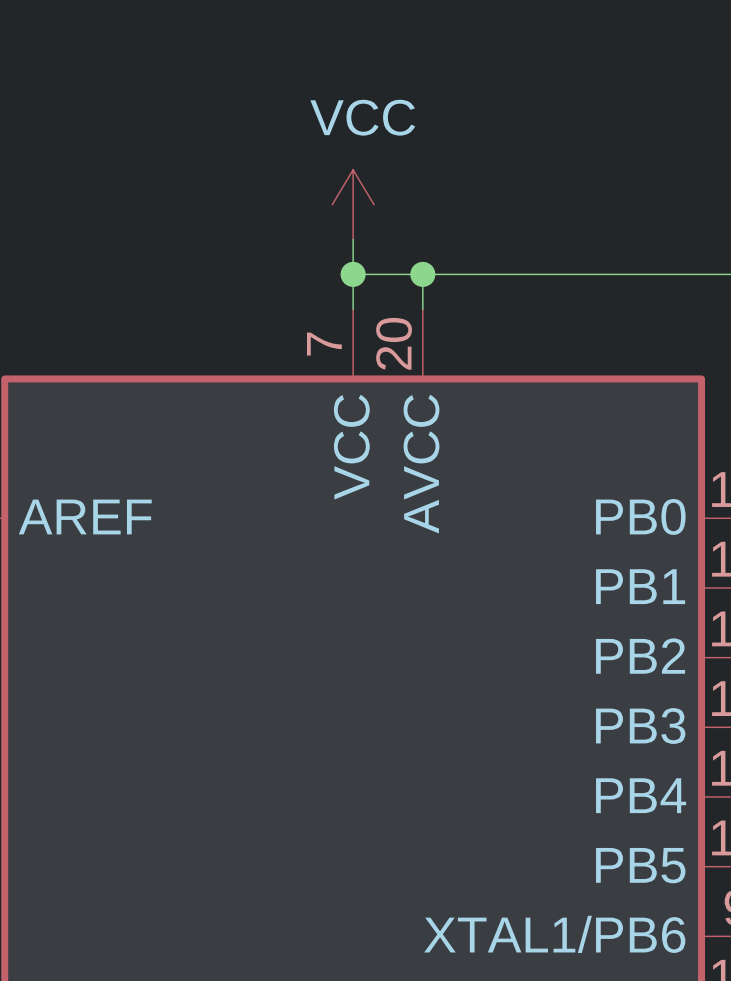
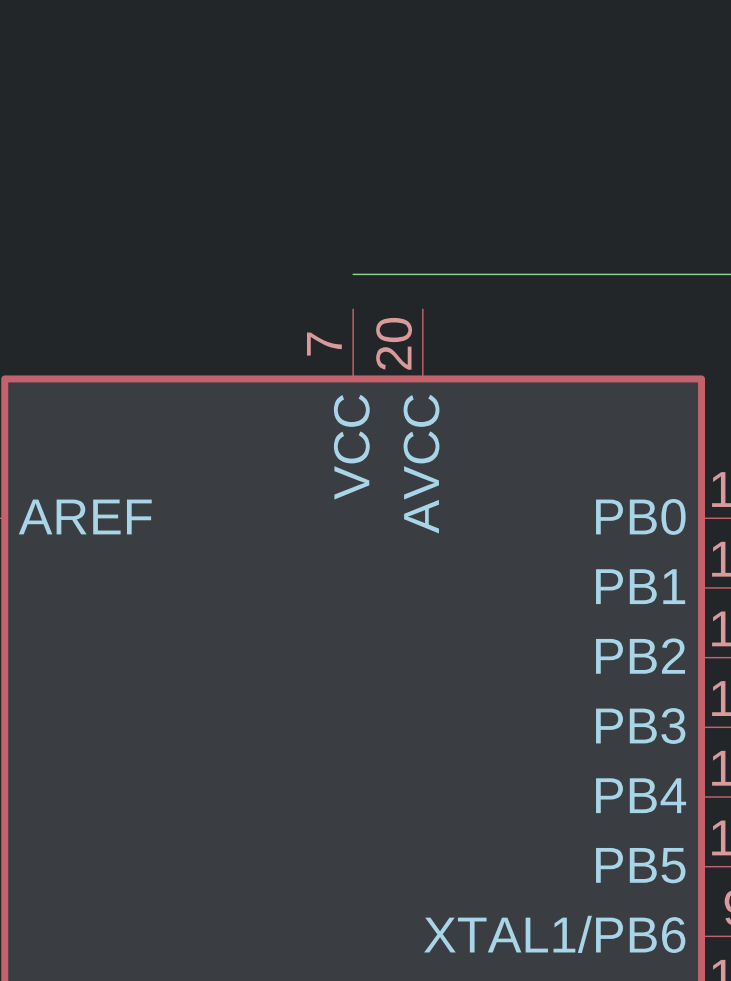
power symbol: VCC (353, 204) -> none
wire: (353, 239) (353, 309) -> none
junction: (353, 274) -> none
wire: (422, 274) (422, 309) -> none
junction: (422, 274) -> none

